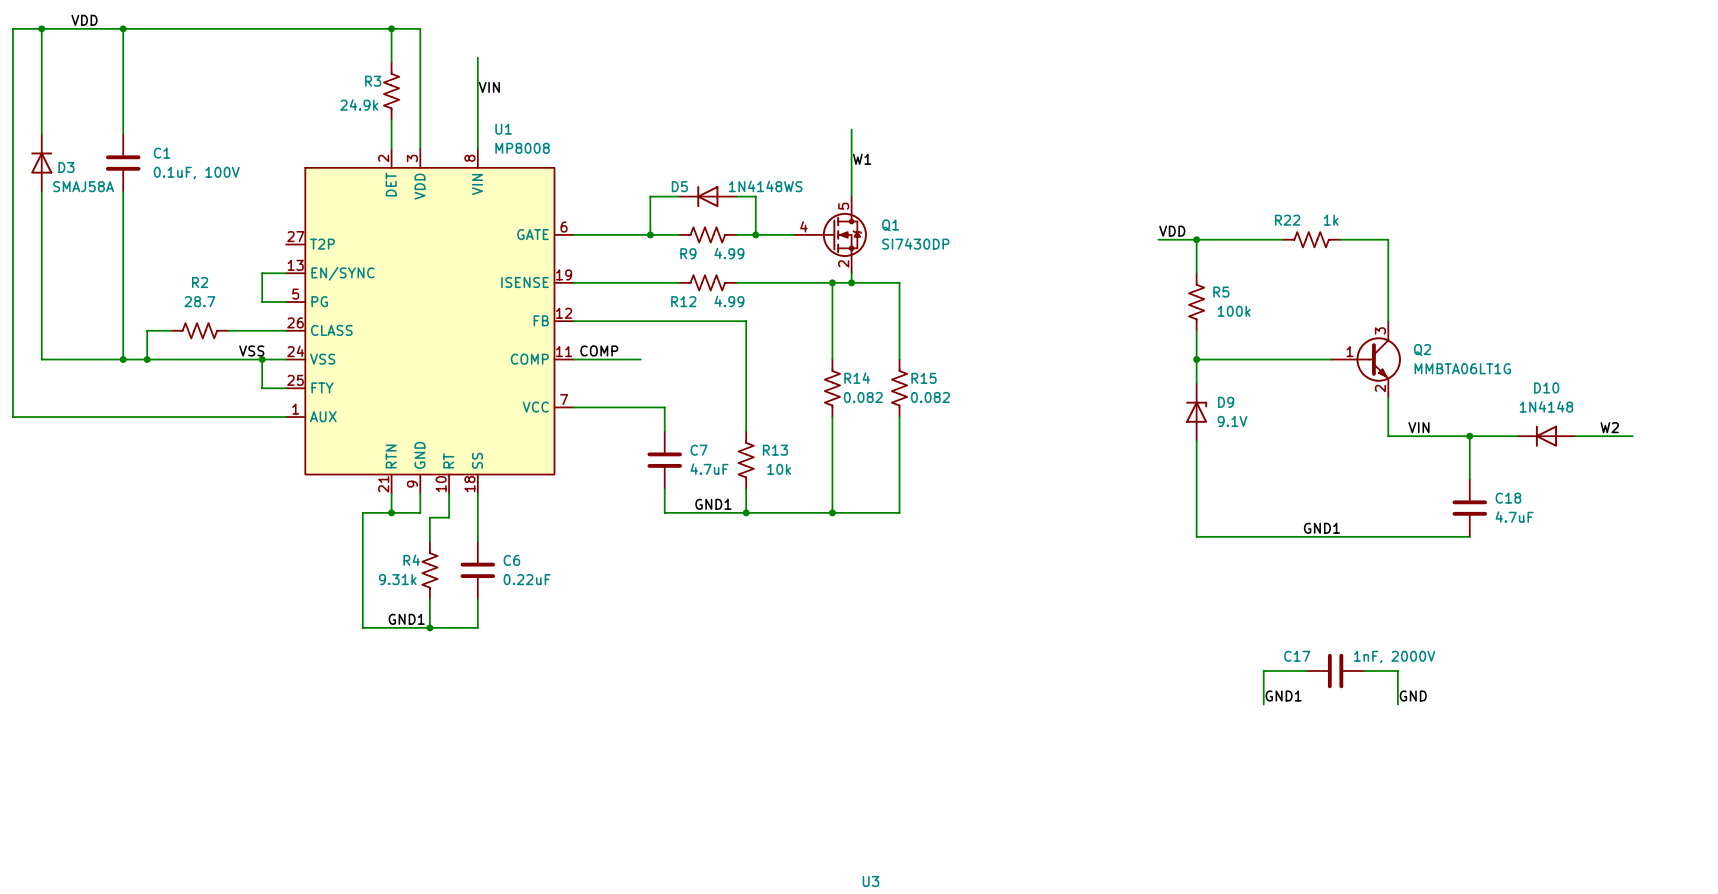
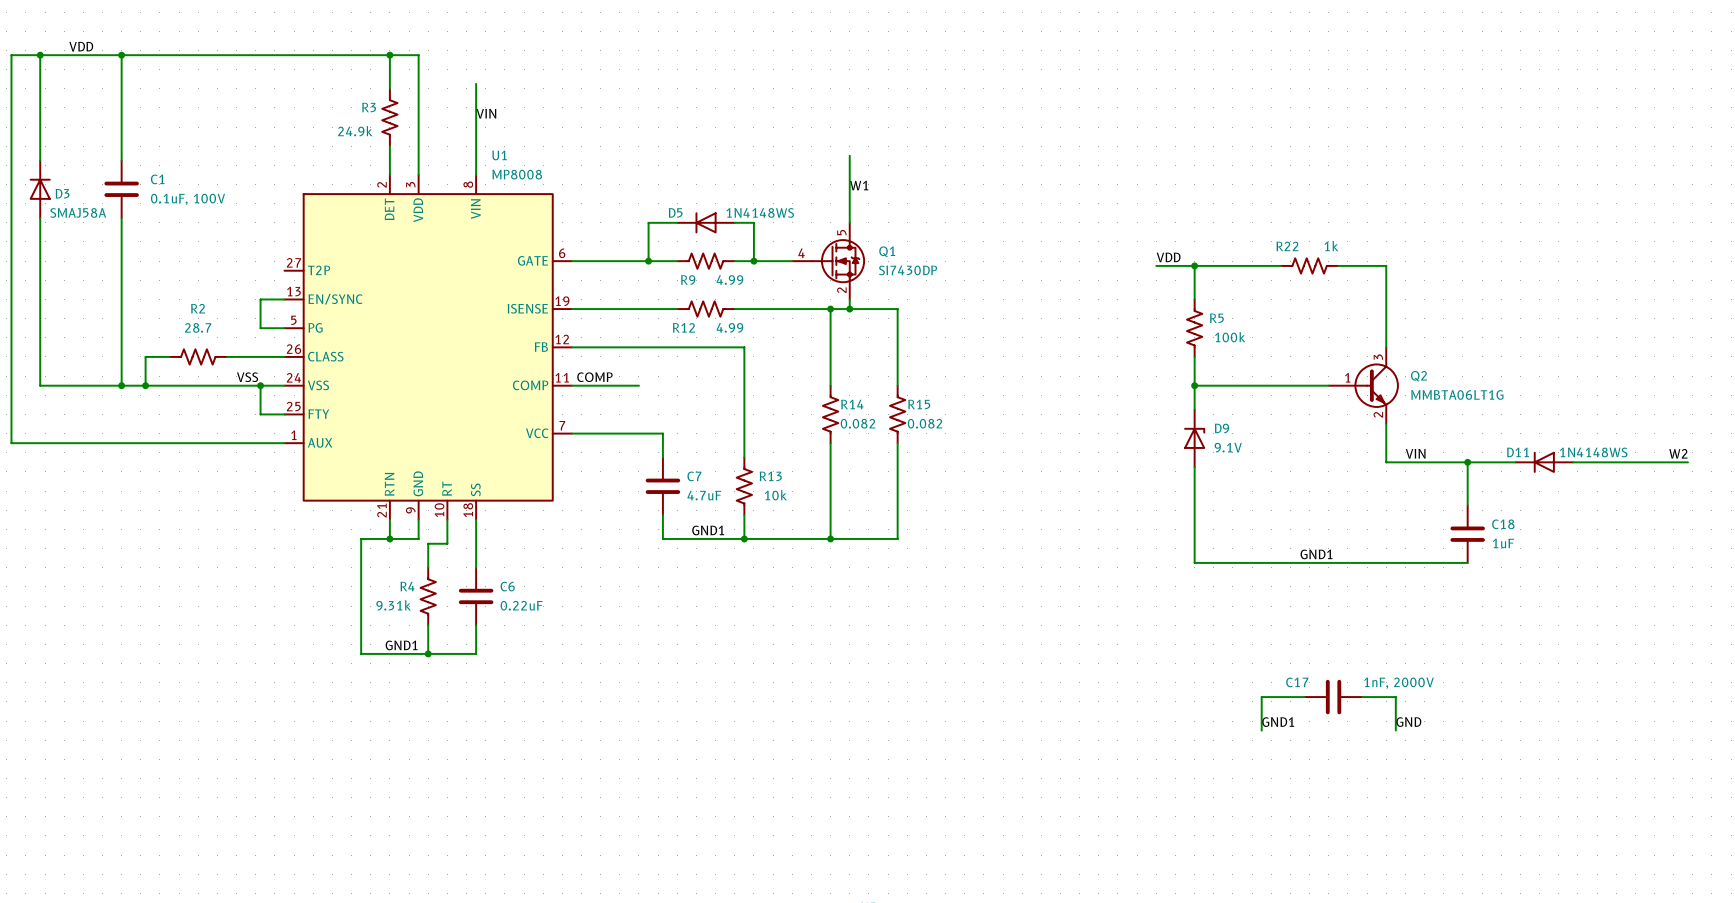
D10 name: D10 (1546, 387) -> D11 (1518, 452)
D10 value: 1N4148 (1546, 406) -> 1N4148WS (1593, 452)
label position: W2 (1609, 427) -> W2 (1678, 453)
wire: none -> (1630, 462) (1688, 462)
C18 value: 4.7uF (1514, 517) -> 1uF (1503, 543)

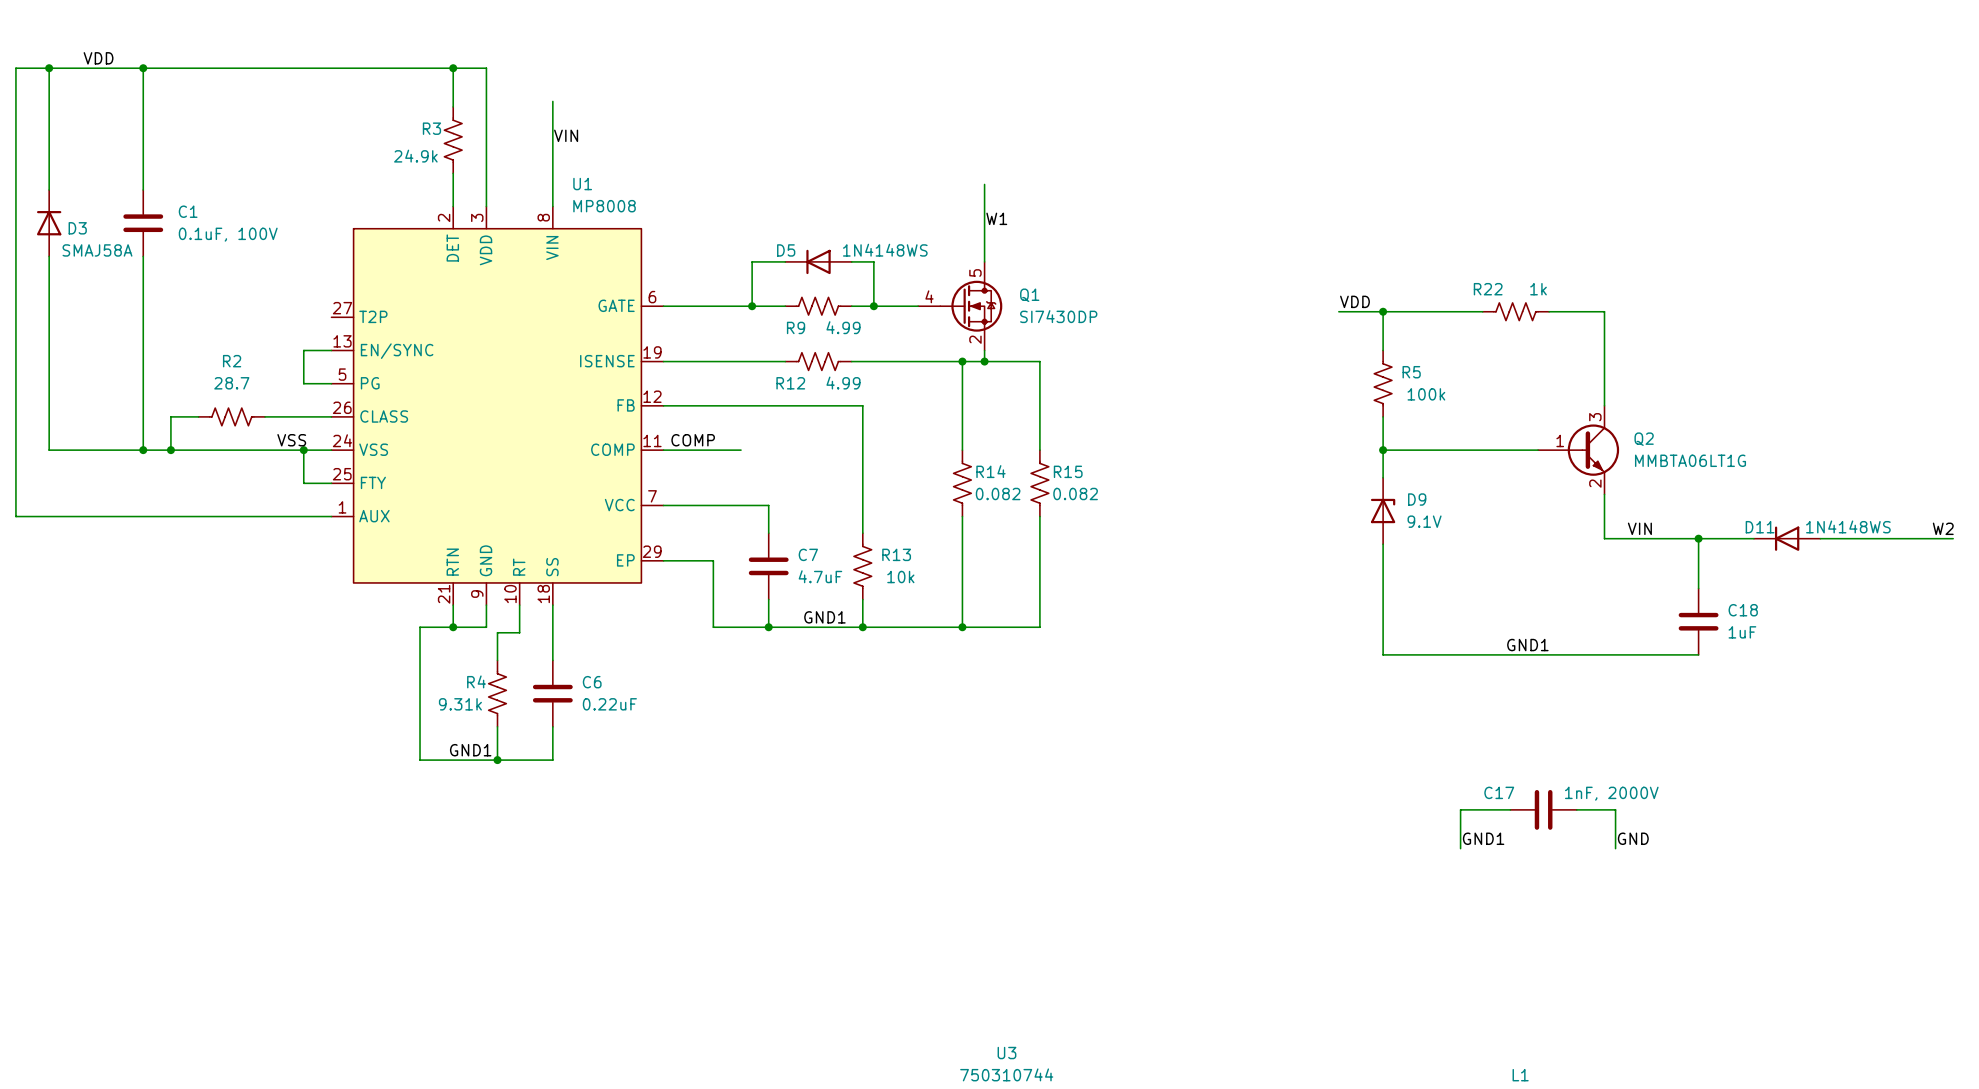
U1 symbol: [284, 174, 572, 520] -> [331, 206, 664, 606]
wire: none -> (663, 560) (713, 560) (713, 627) (768, 627)
junction: none -> (768, 627)

